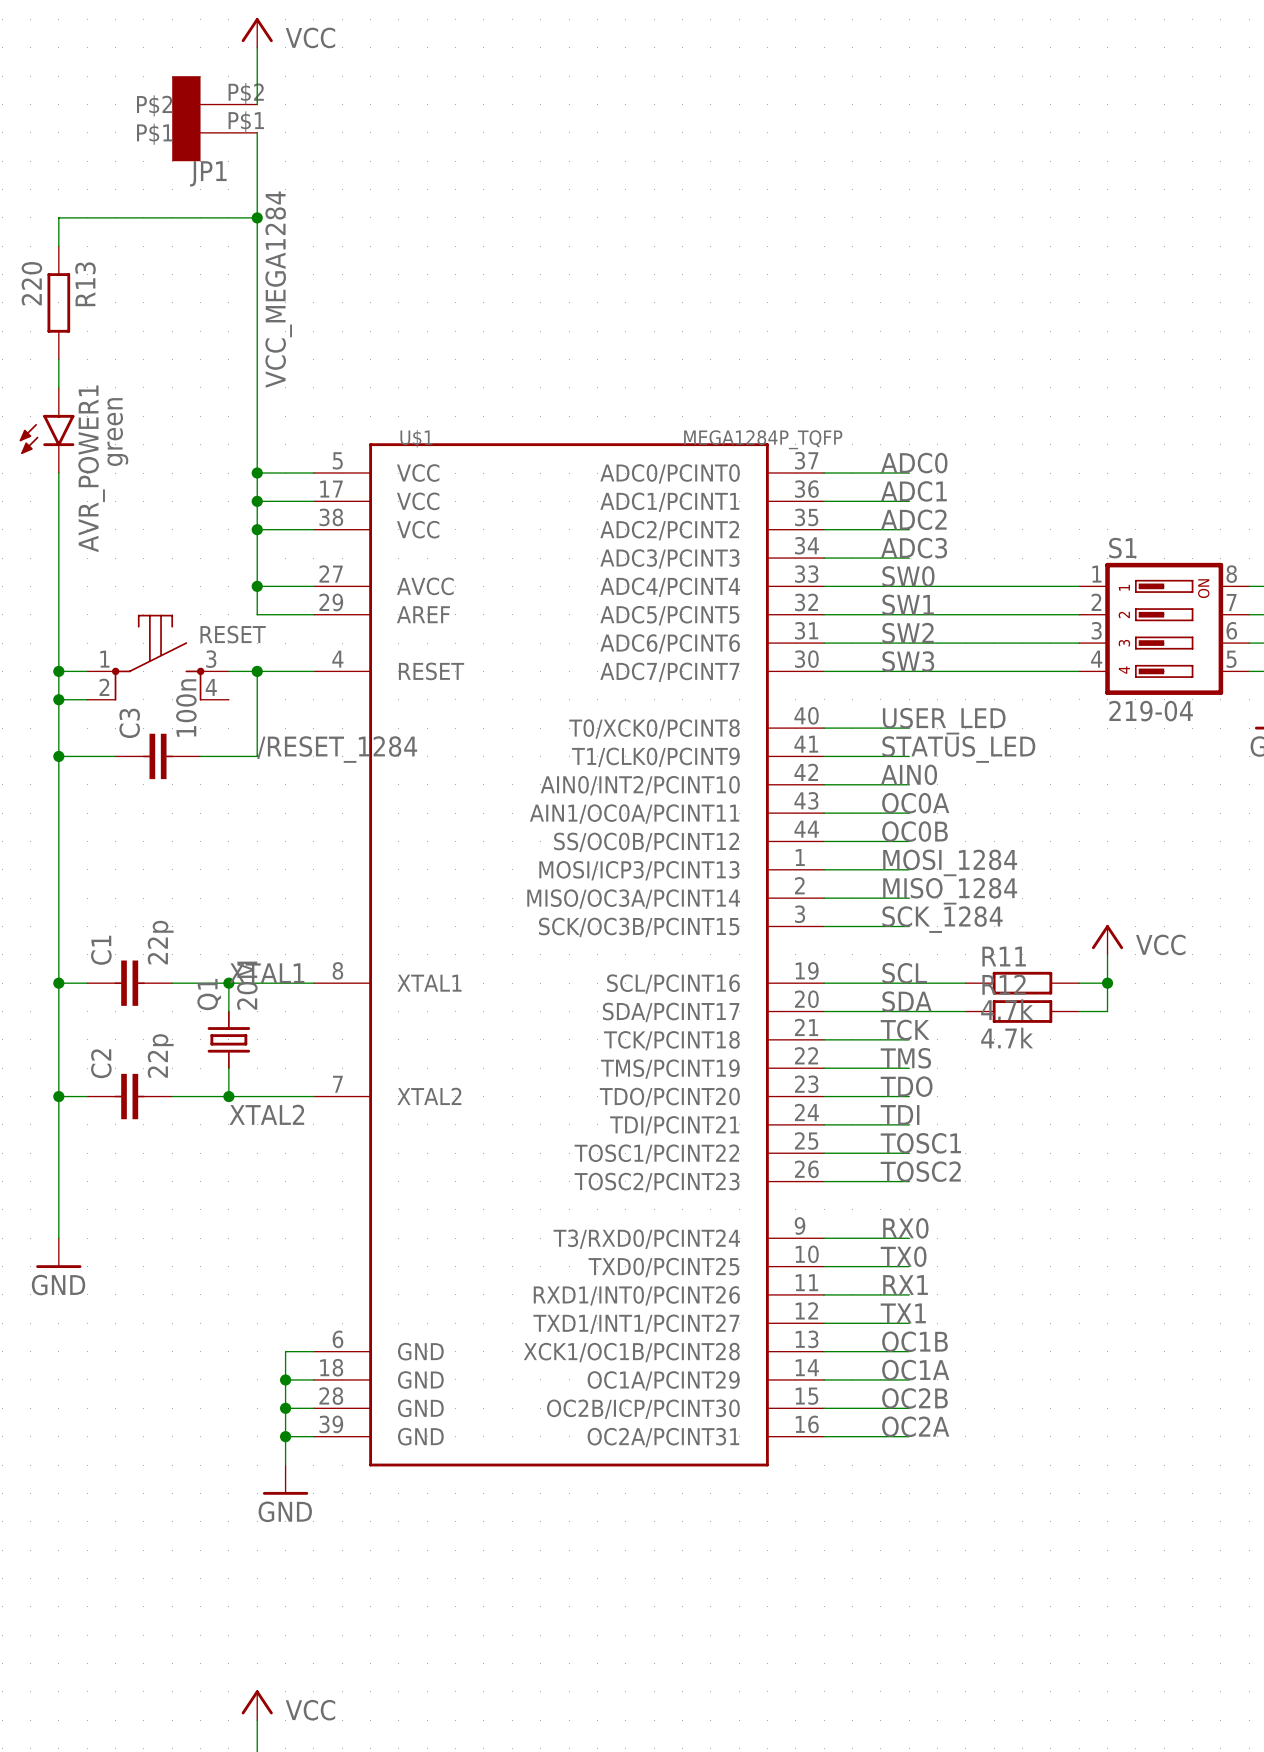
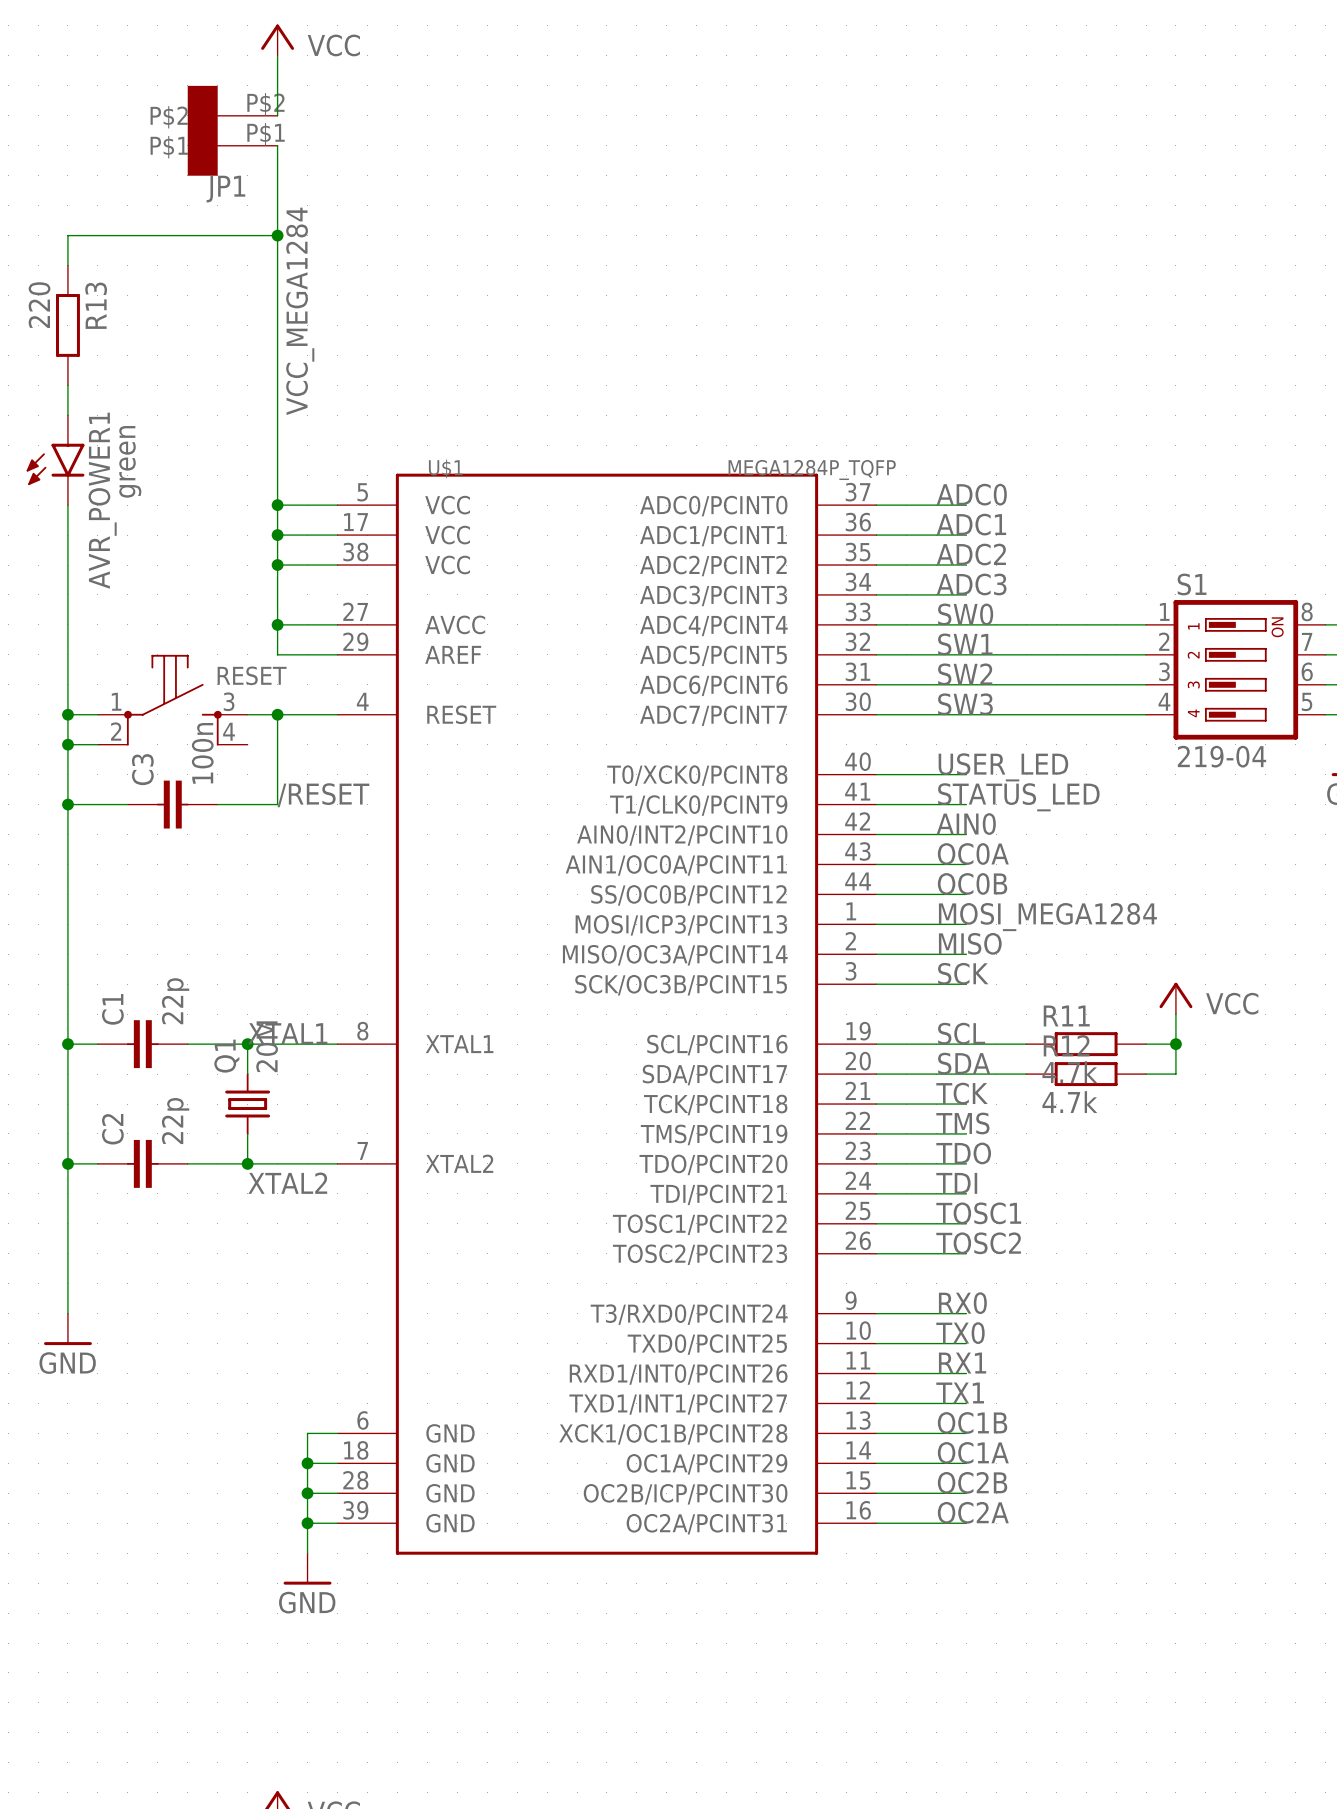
label: /RESET_1284 (337, 749) -> /RESET (323, 795)
label: MOSI_1284 (950, 862) -> MOSI_MEGA1284 (1047, 917)
label: MISO_1284 (950, 891) -> MISO (970, 943)
label: SCK_1284 (942, 919) -> SCK (963, 973)

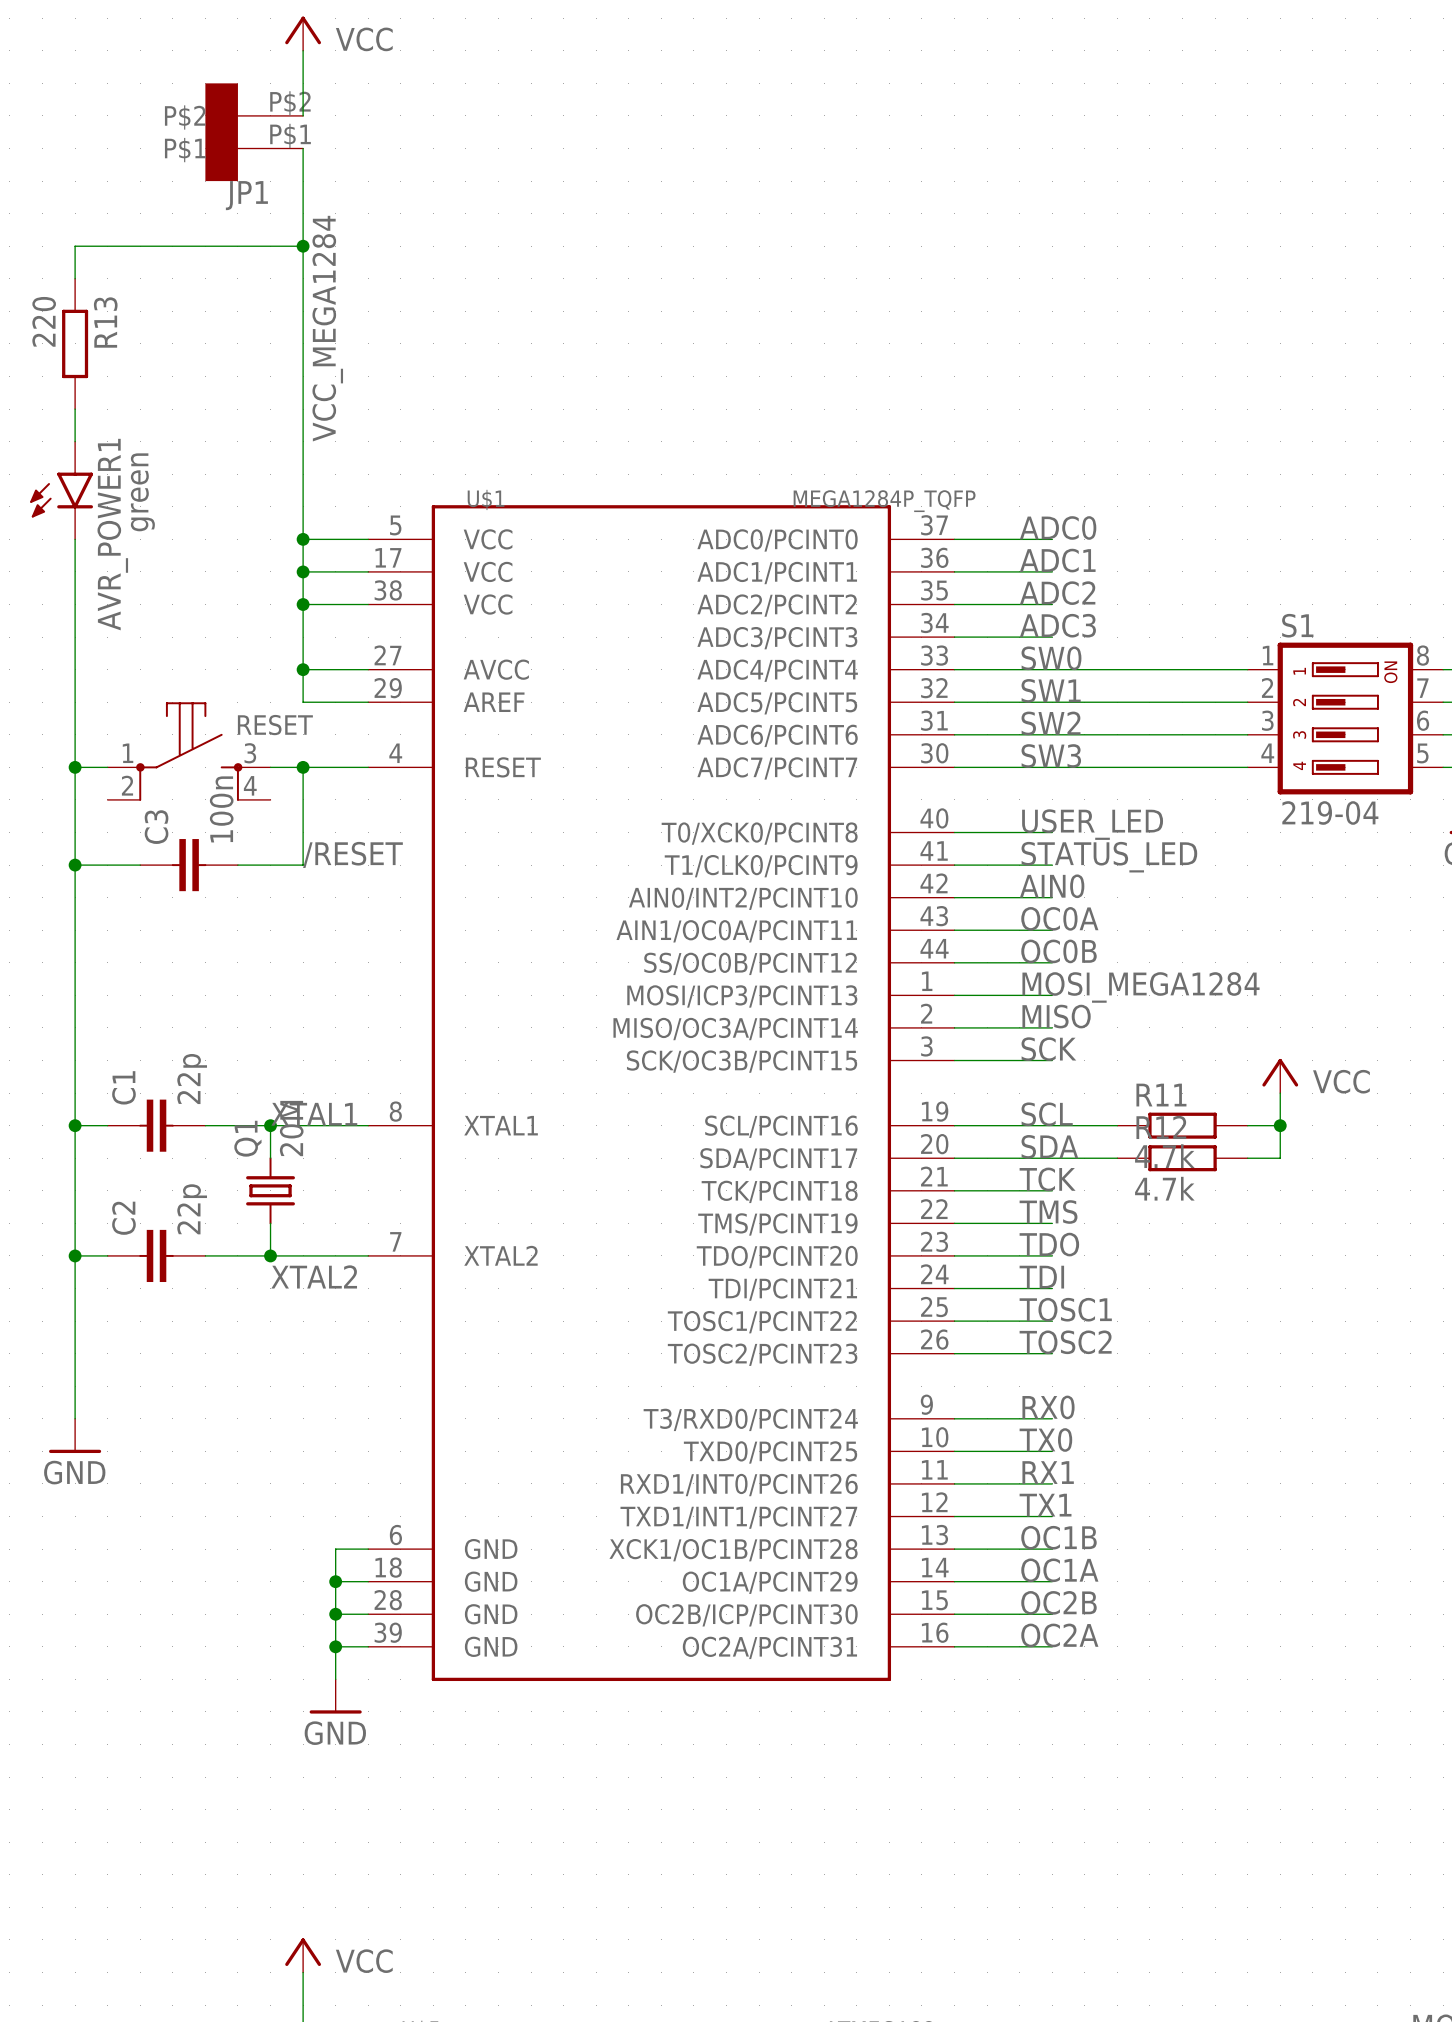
wire: (67, 744) (97, 744) -> none
junction: (67, 744) -> none

